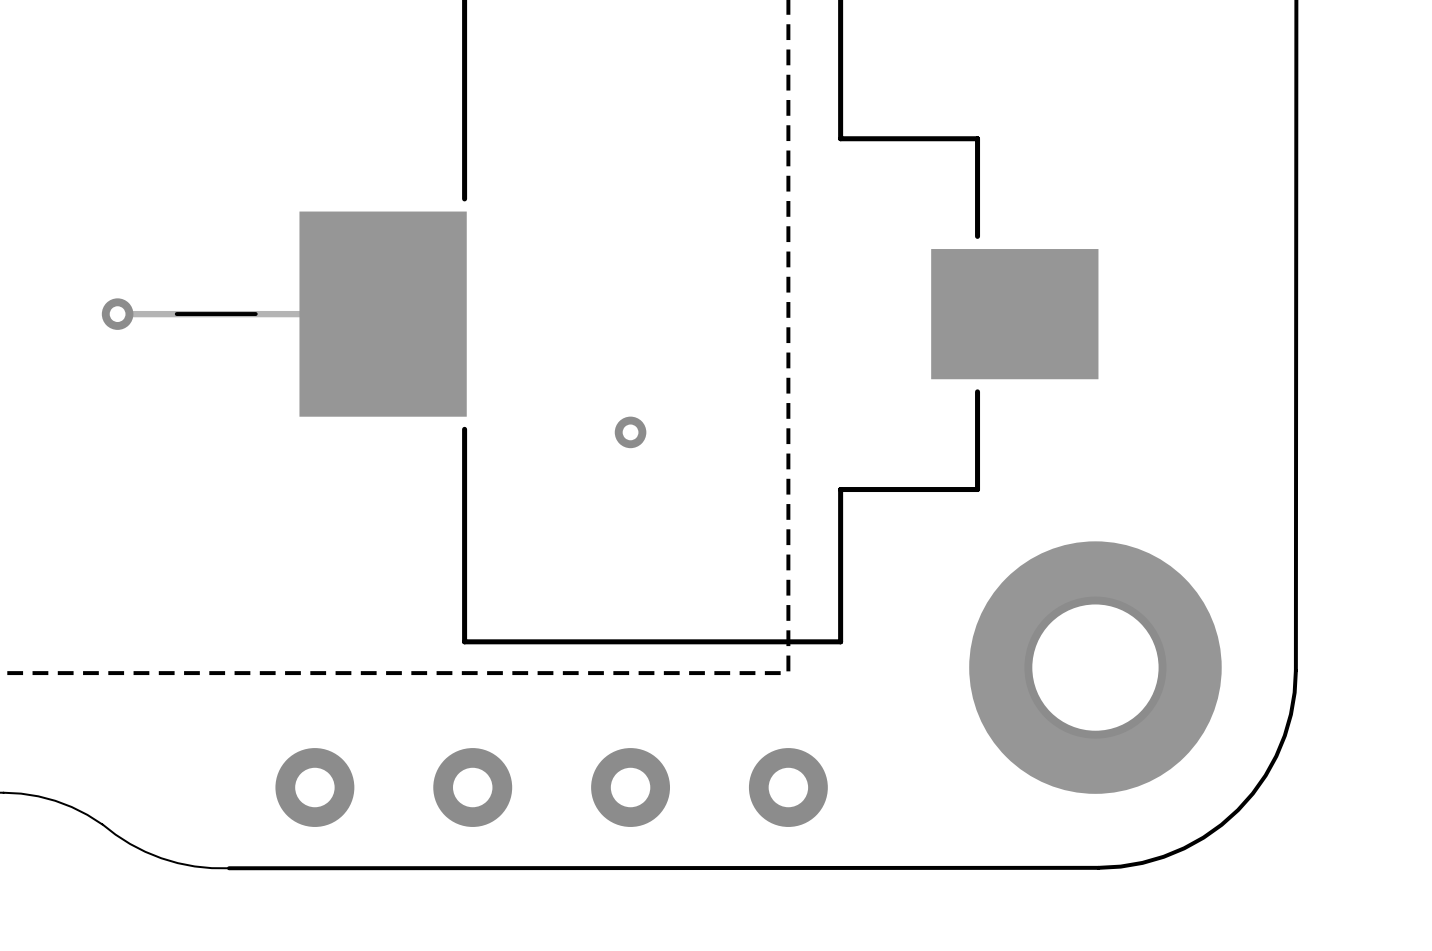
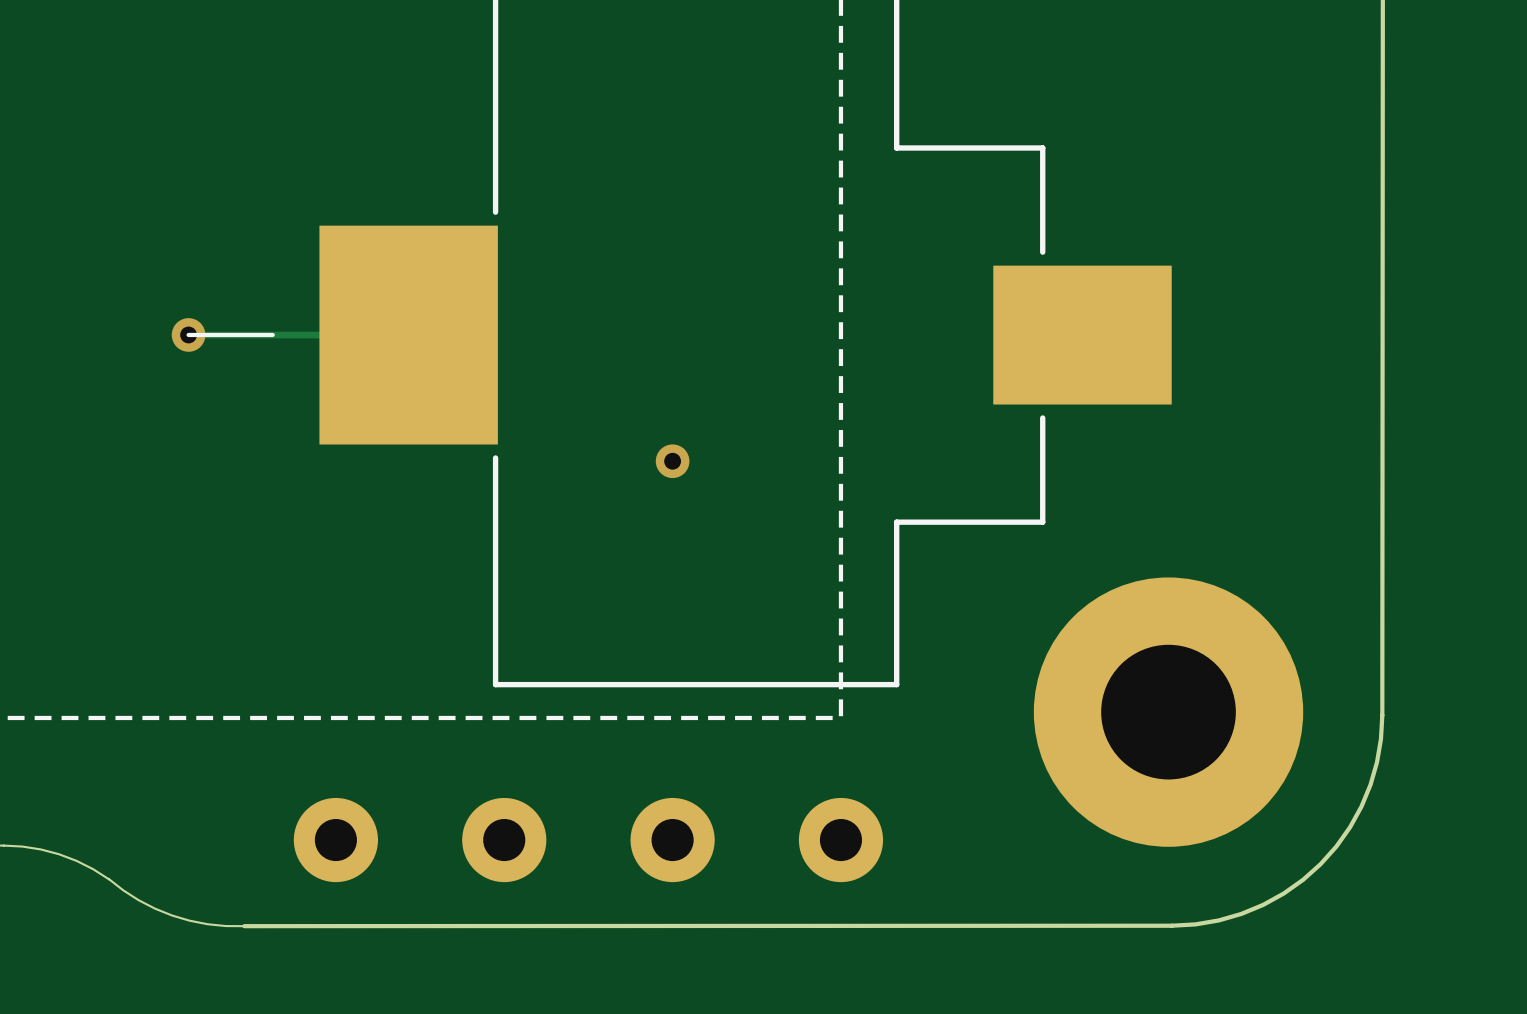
via position: (117, 314) -> (188, 334)
track: (176, 314) (117, 314) -> none

